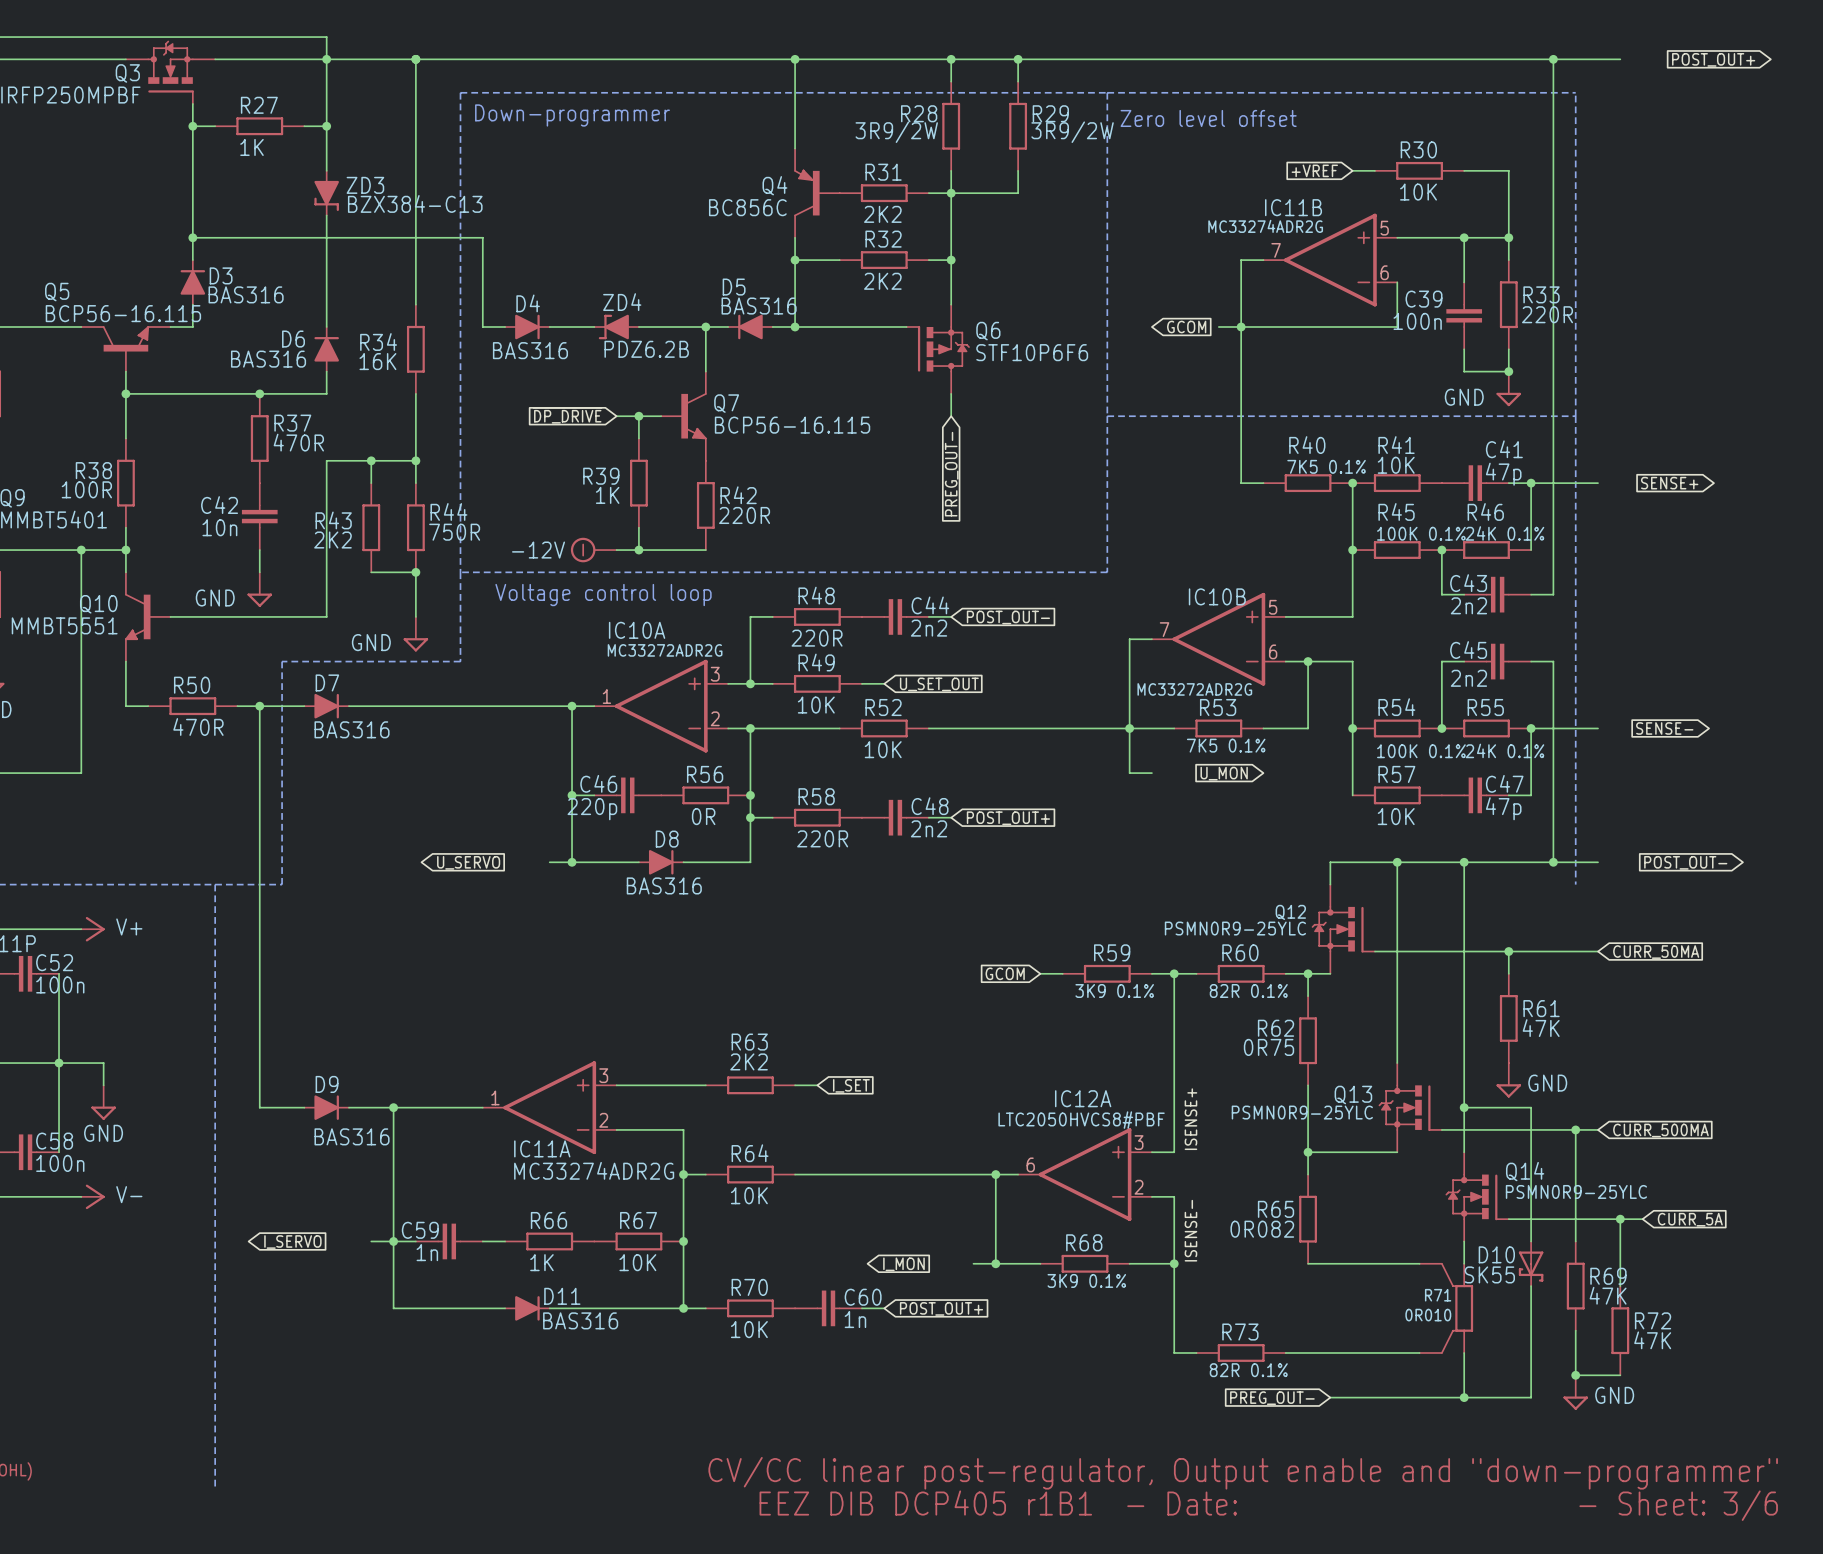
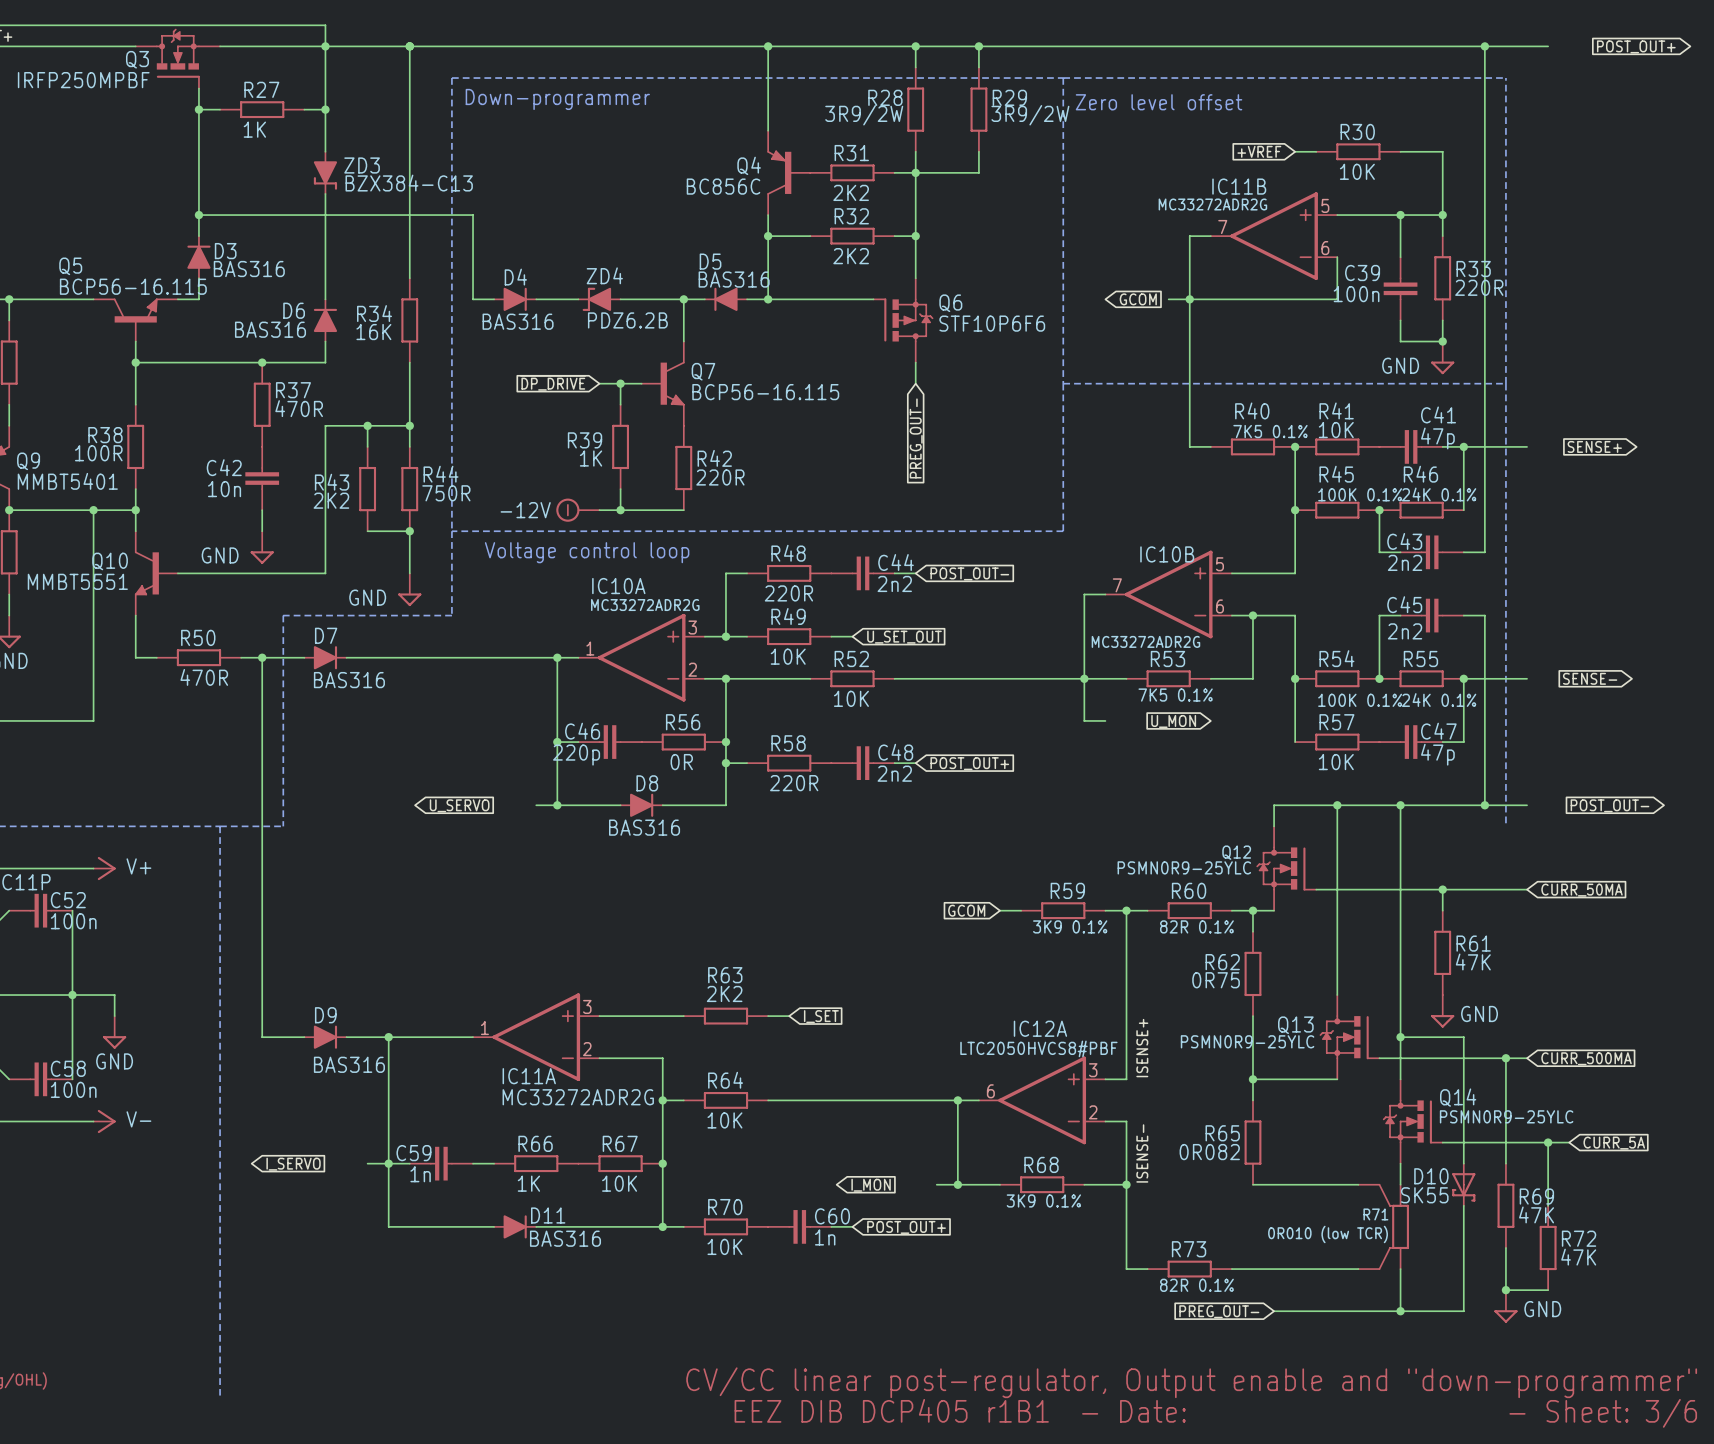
IC11B value: MC33274ADR2G (1265, 226) -> MC33272ADR2G (1212, 204)
IC11A value: MC33274ADR2G (594, 1170) -> MC33272ADR2G (578, 1097)
R71 value: 0R010 (1428, 1315) -> 0R010 (low TCR) (1328, 1234)

